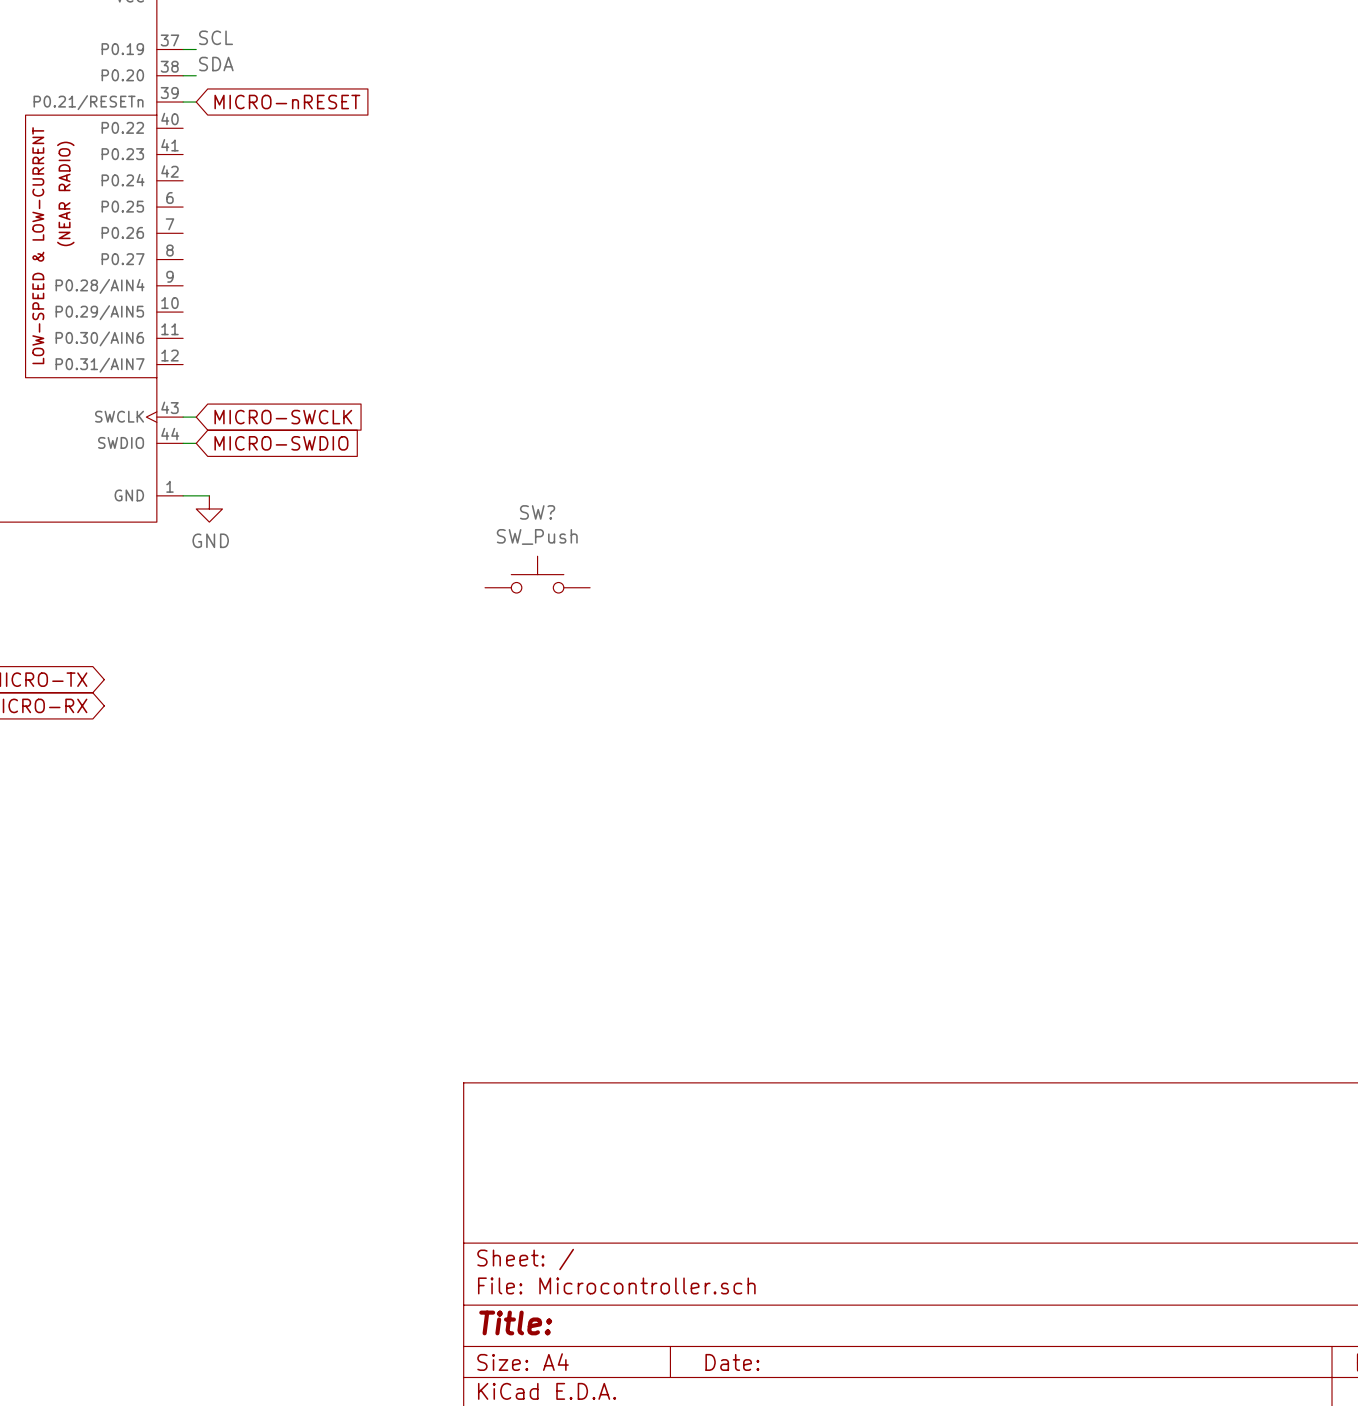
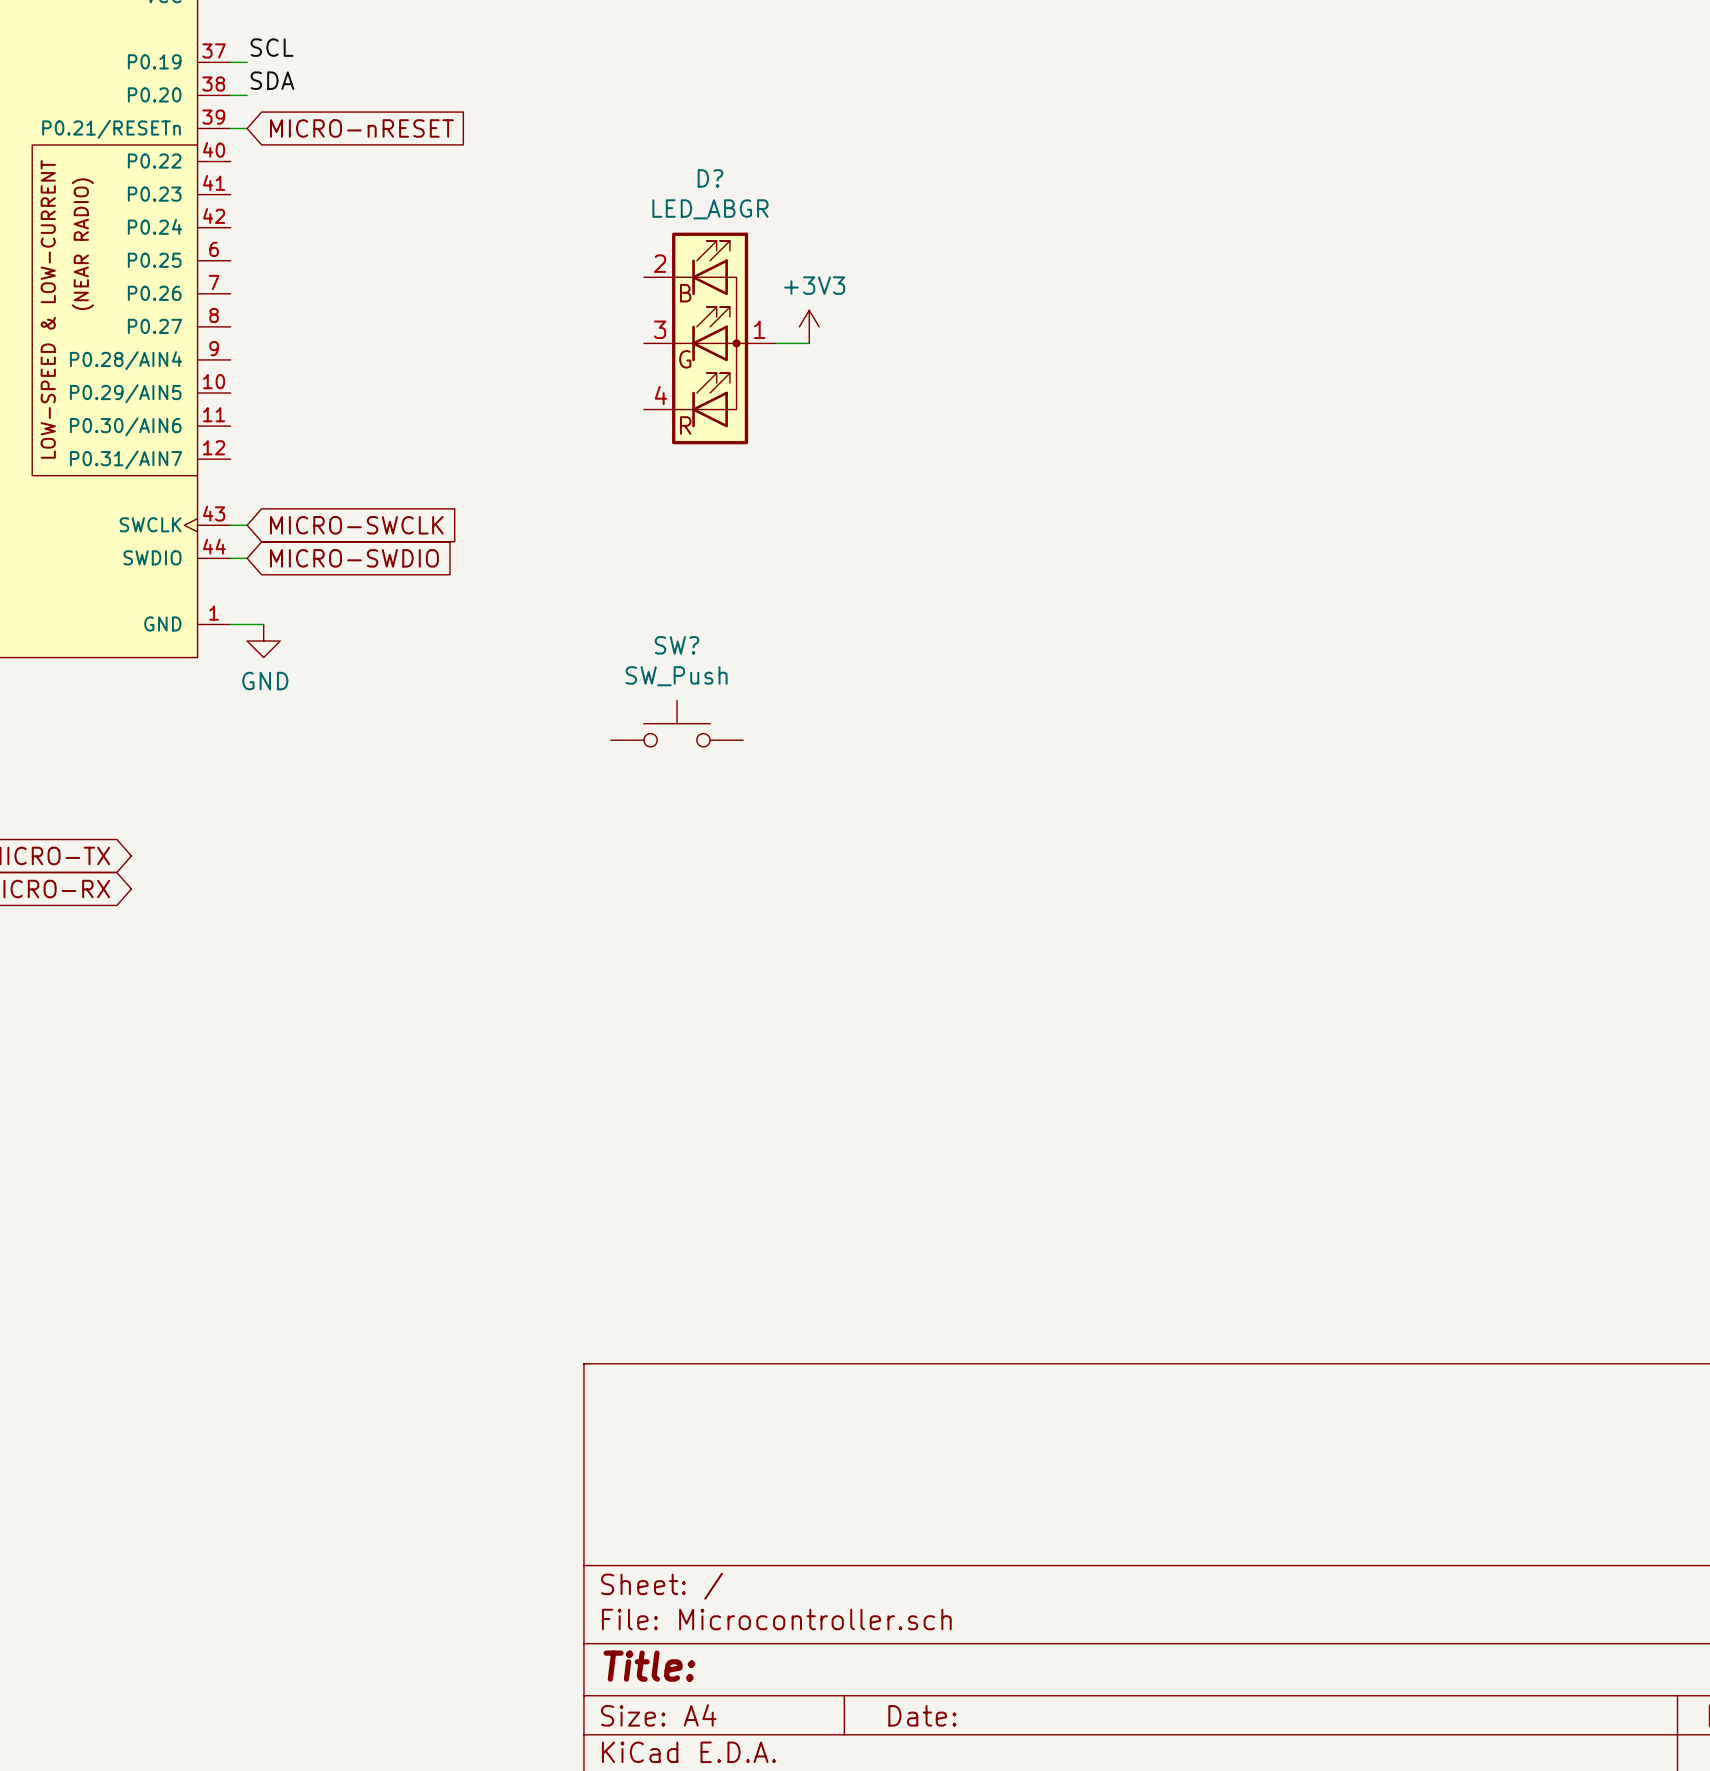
power symbol: none -> +3V3 (809, 326)
D?: none -> LED_ABGR (710, 338)
wire: none -> (776, 343) (809, 343)

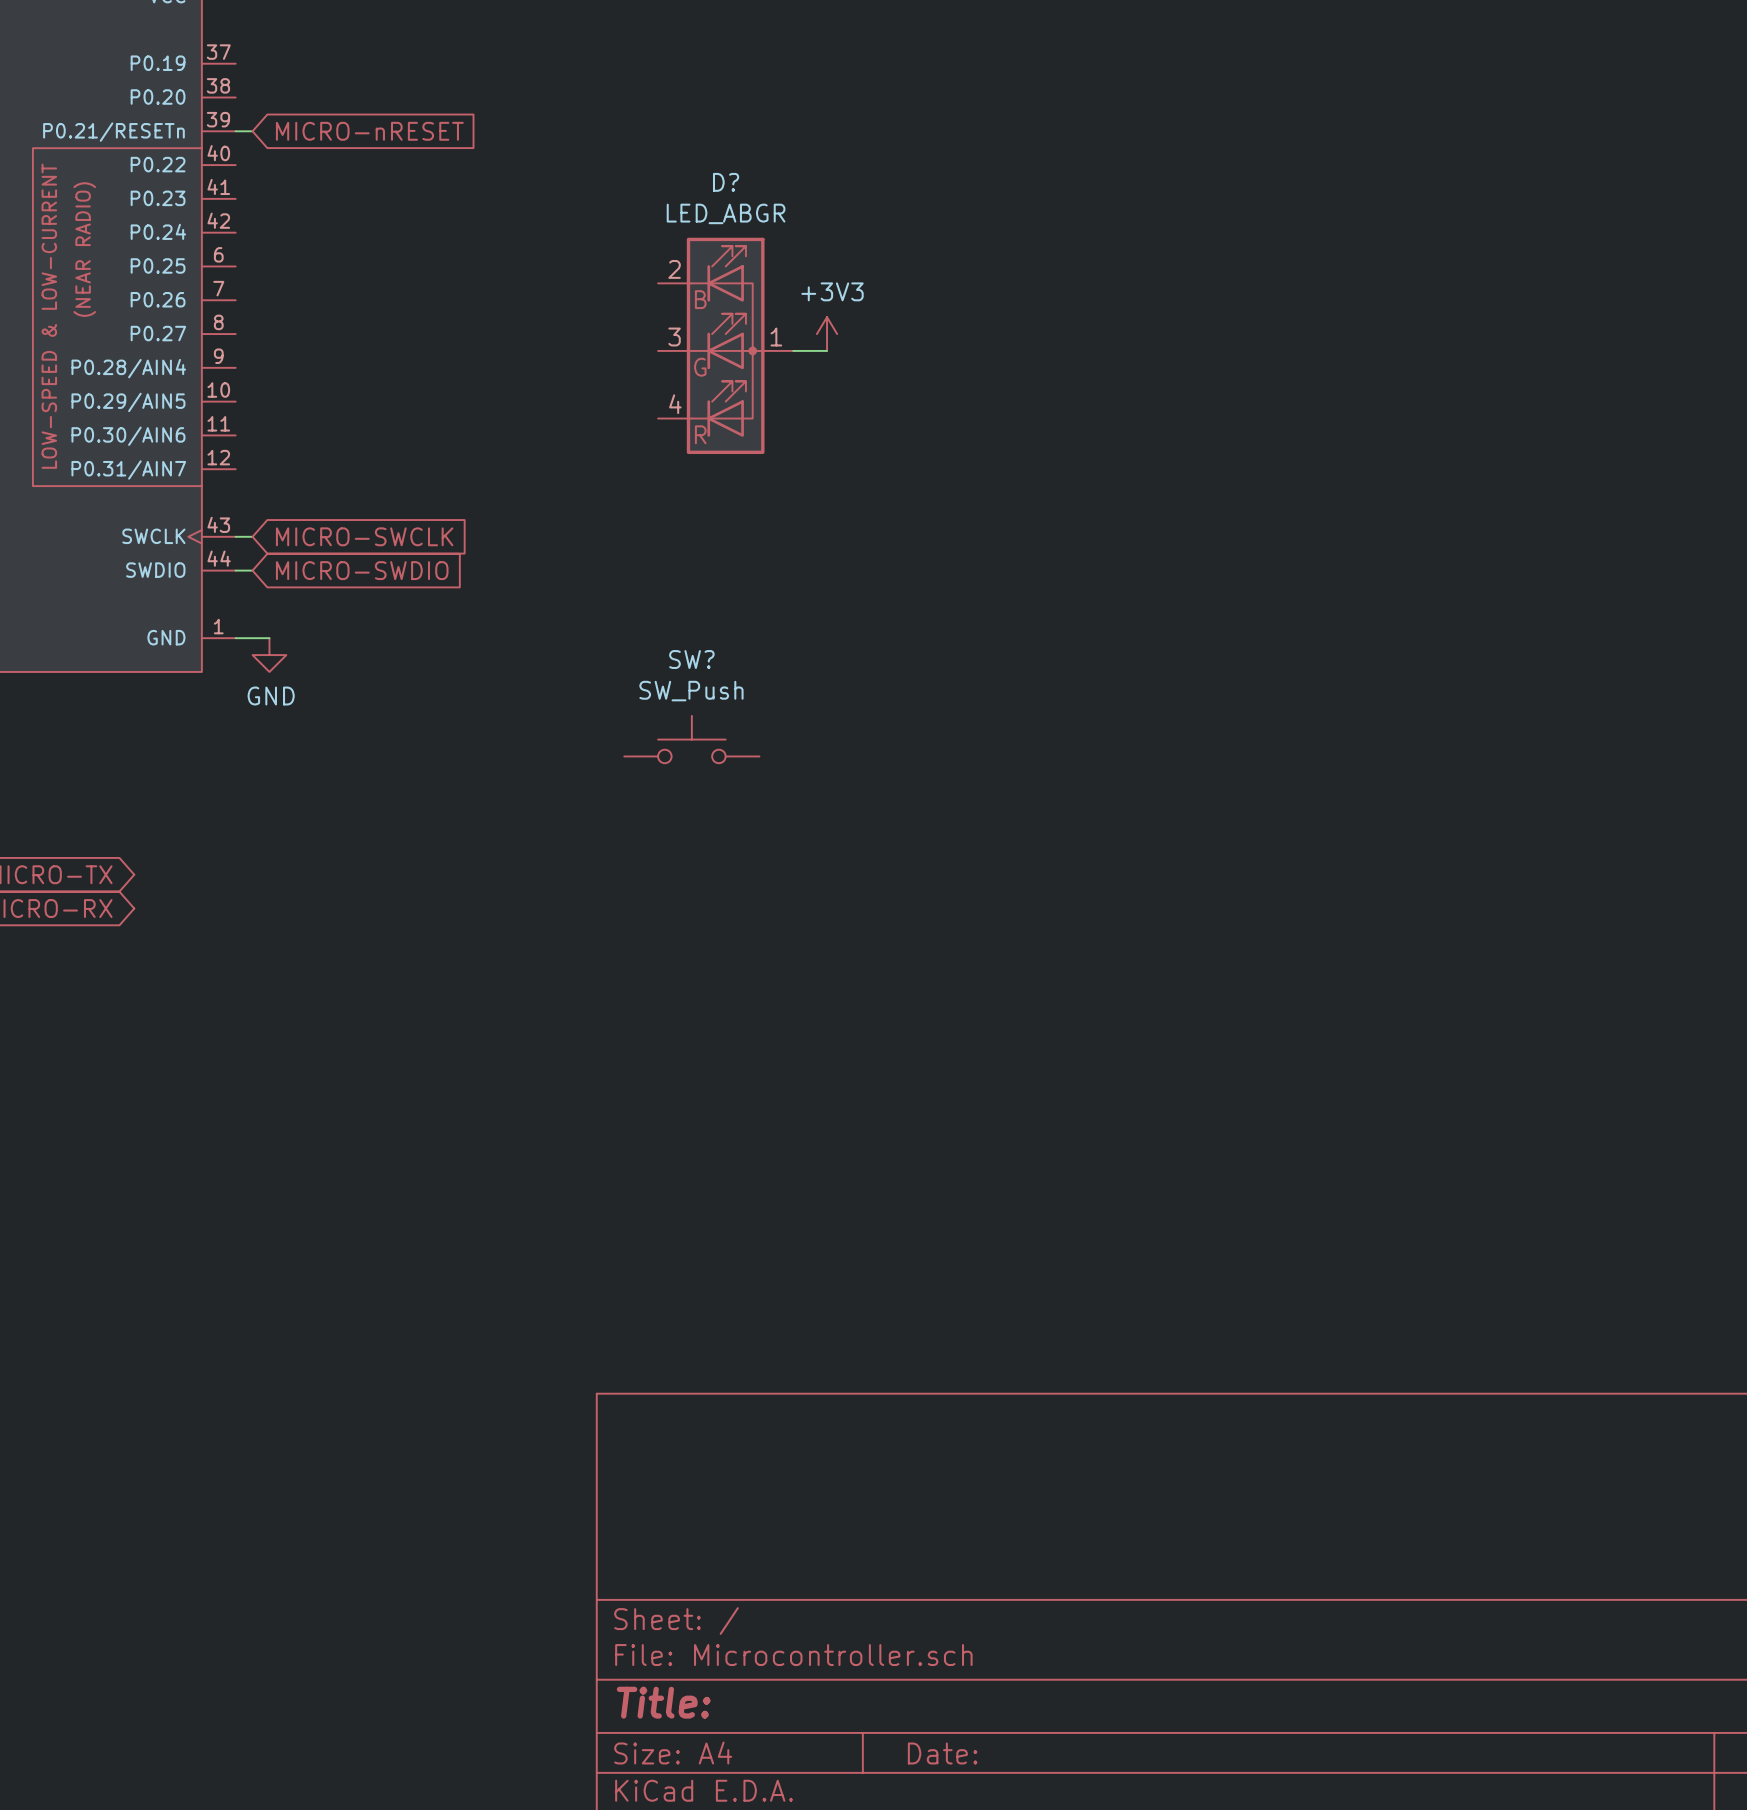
label: SCL (272, 47) -> none
wire: (230, 62) (247, 62) -> none
label: SDA (272, 80) -> none
wire: (230, 95) (247, 95) -> none

